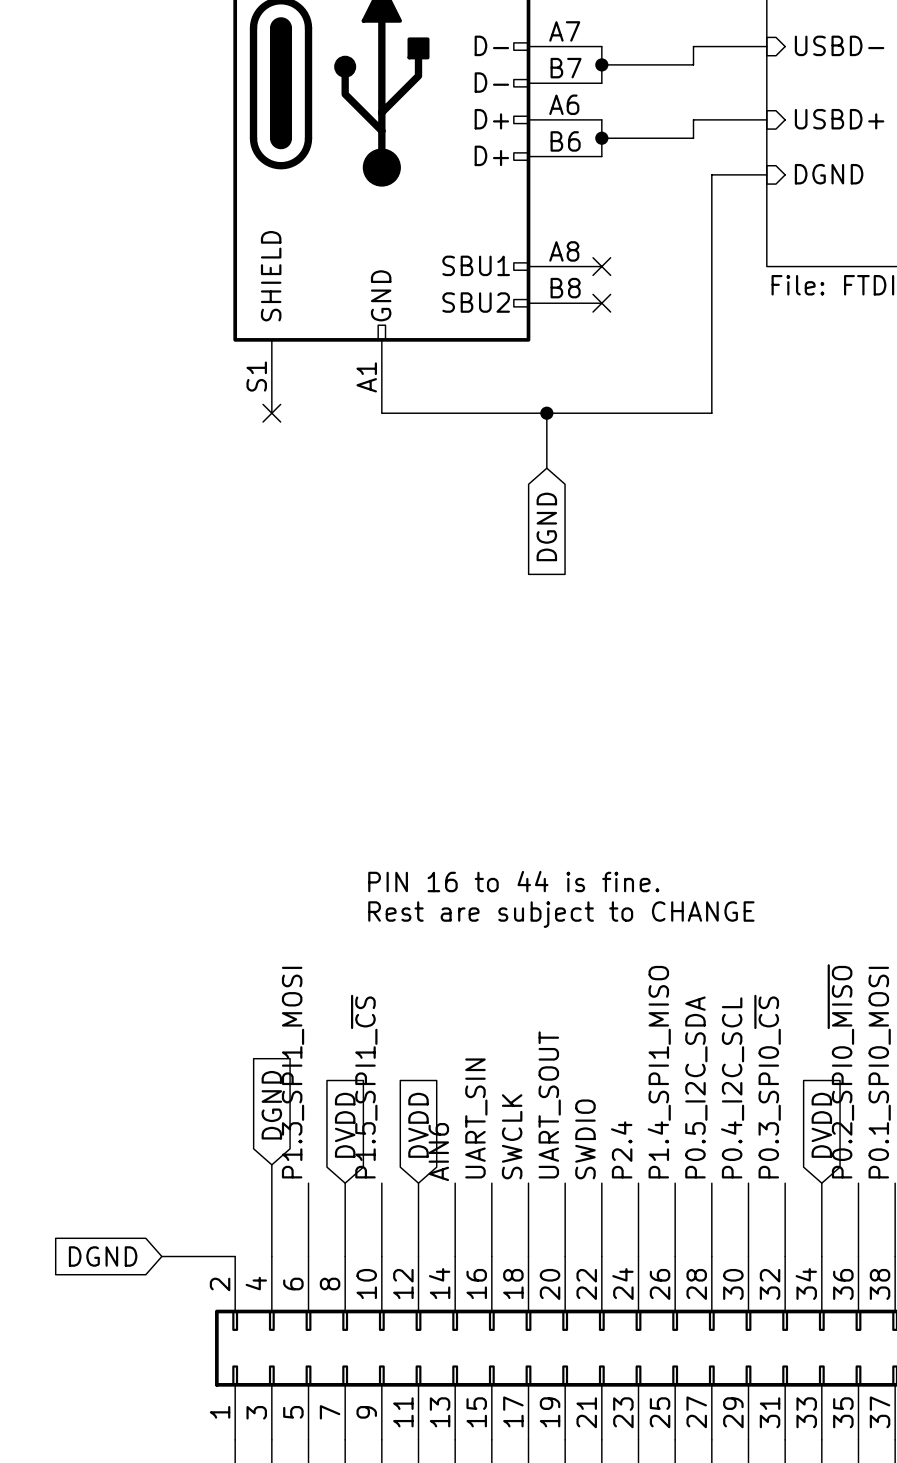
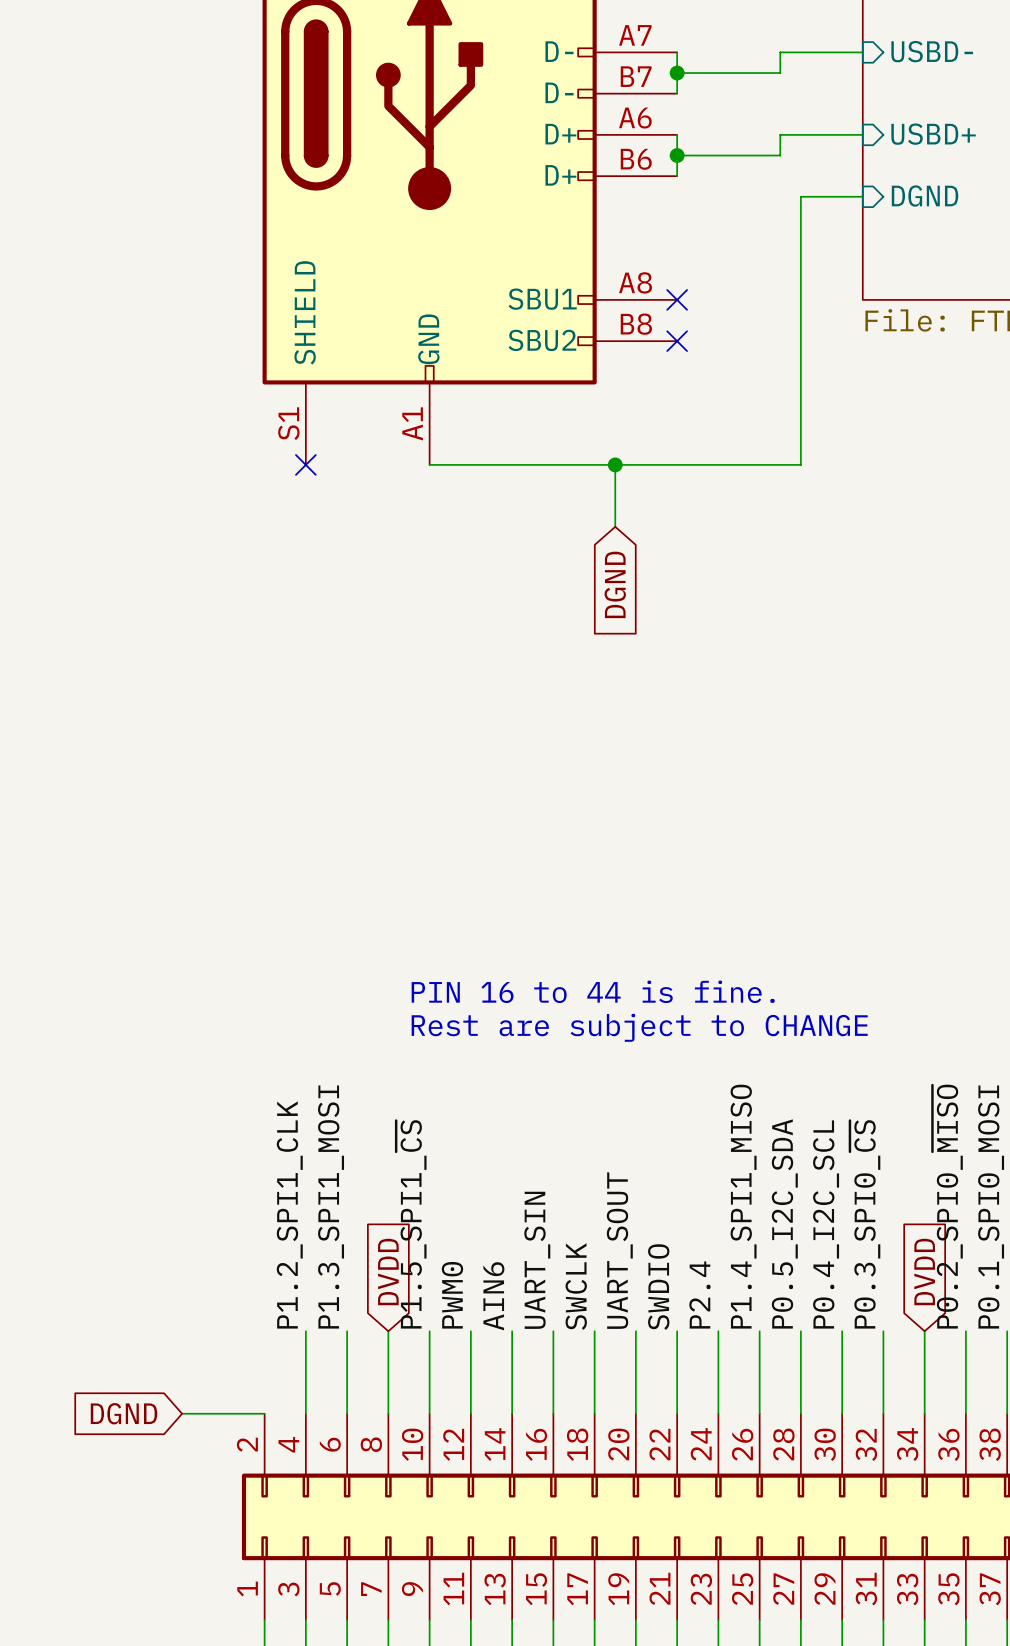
label: none -> P1.2_SPI1_CLK (289, 1214)
global label: DGND (271, 1105) -> none
global label: DVDD (418, 1125) -> none
label: none -> PWM0 (452, 1295)
wire: (271, 1164) (271, 1183) -> none

